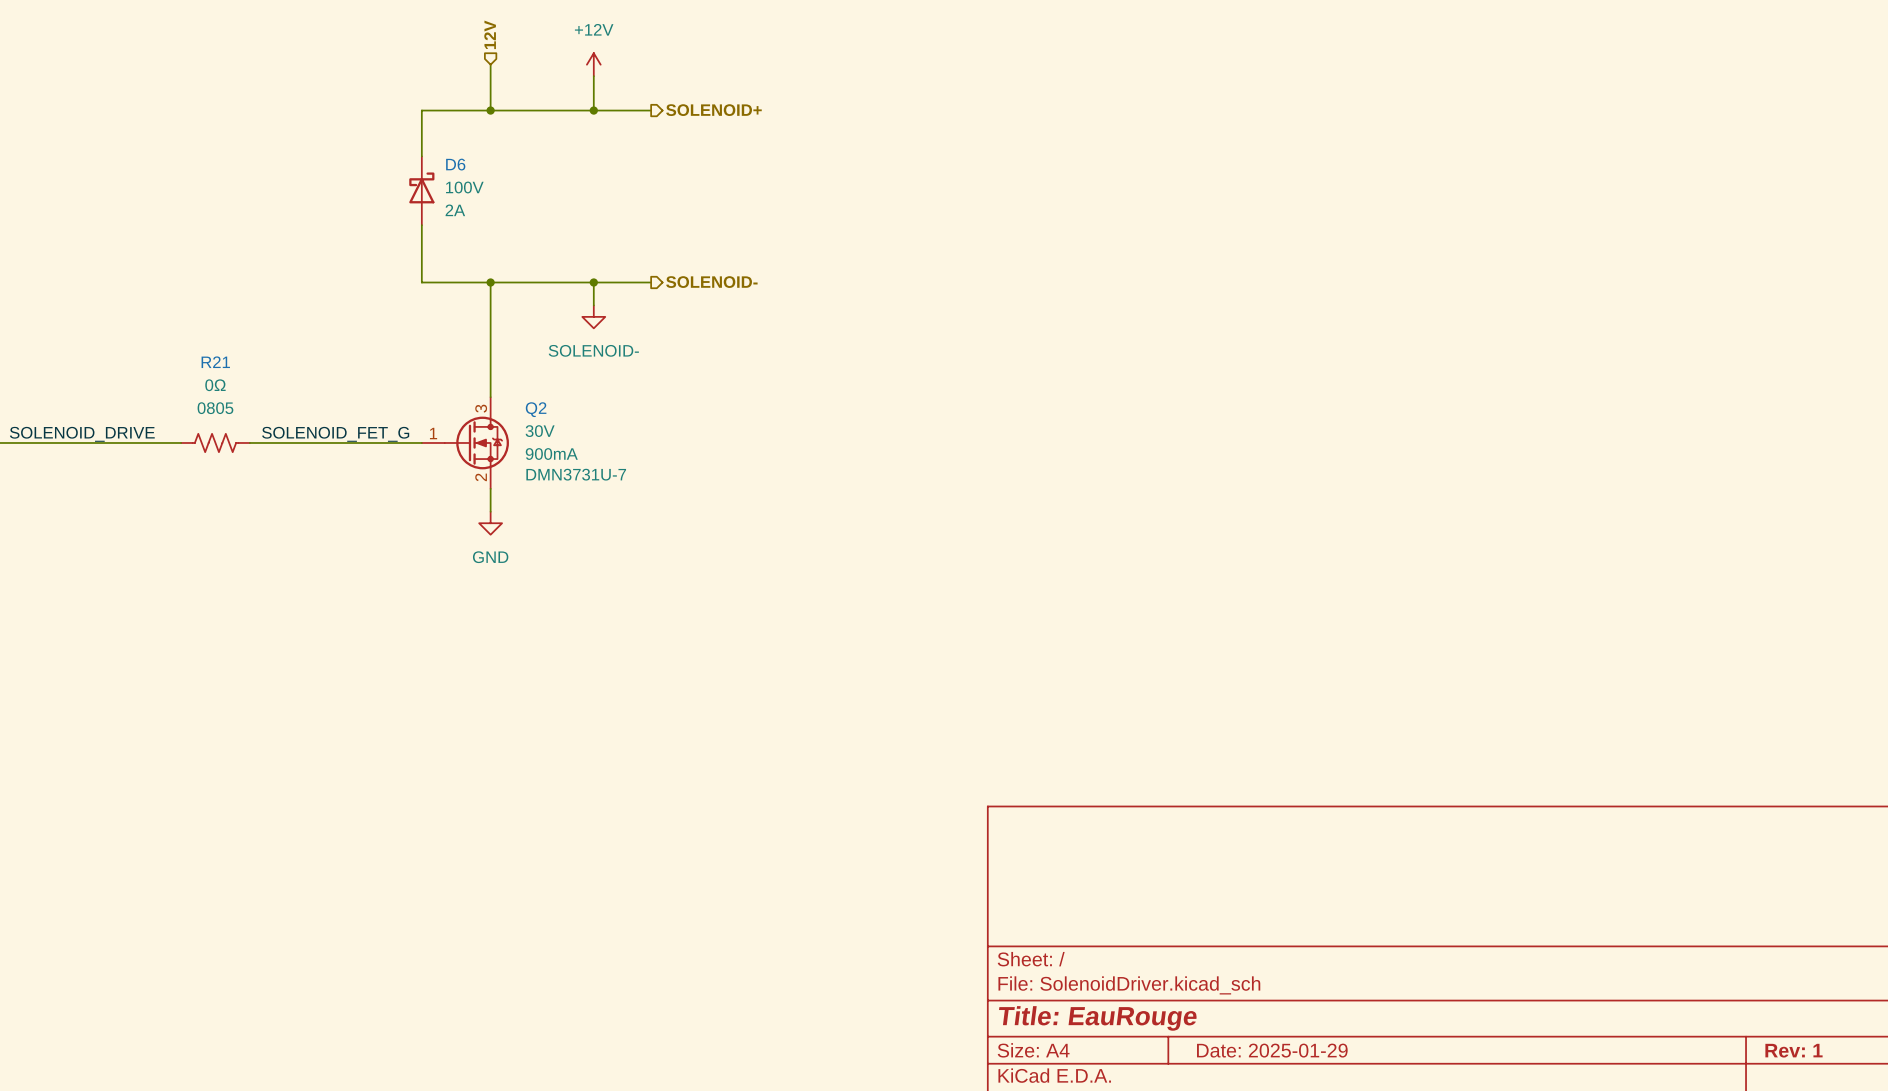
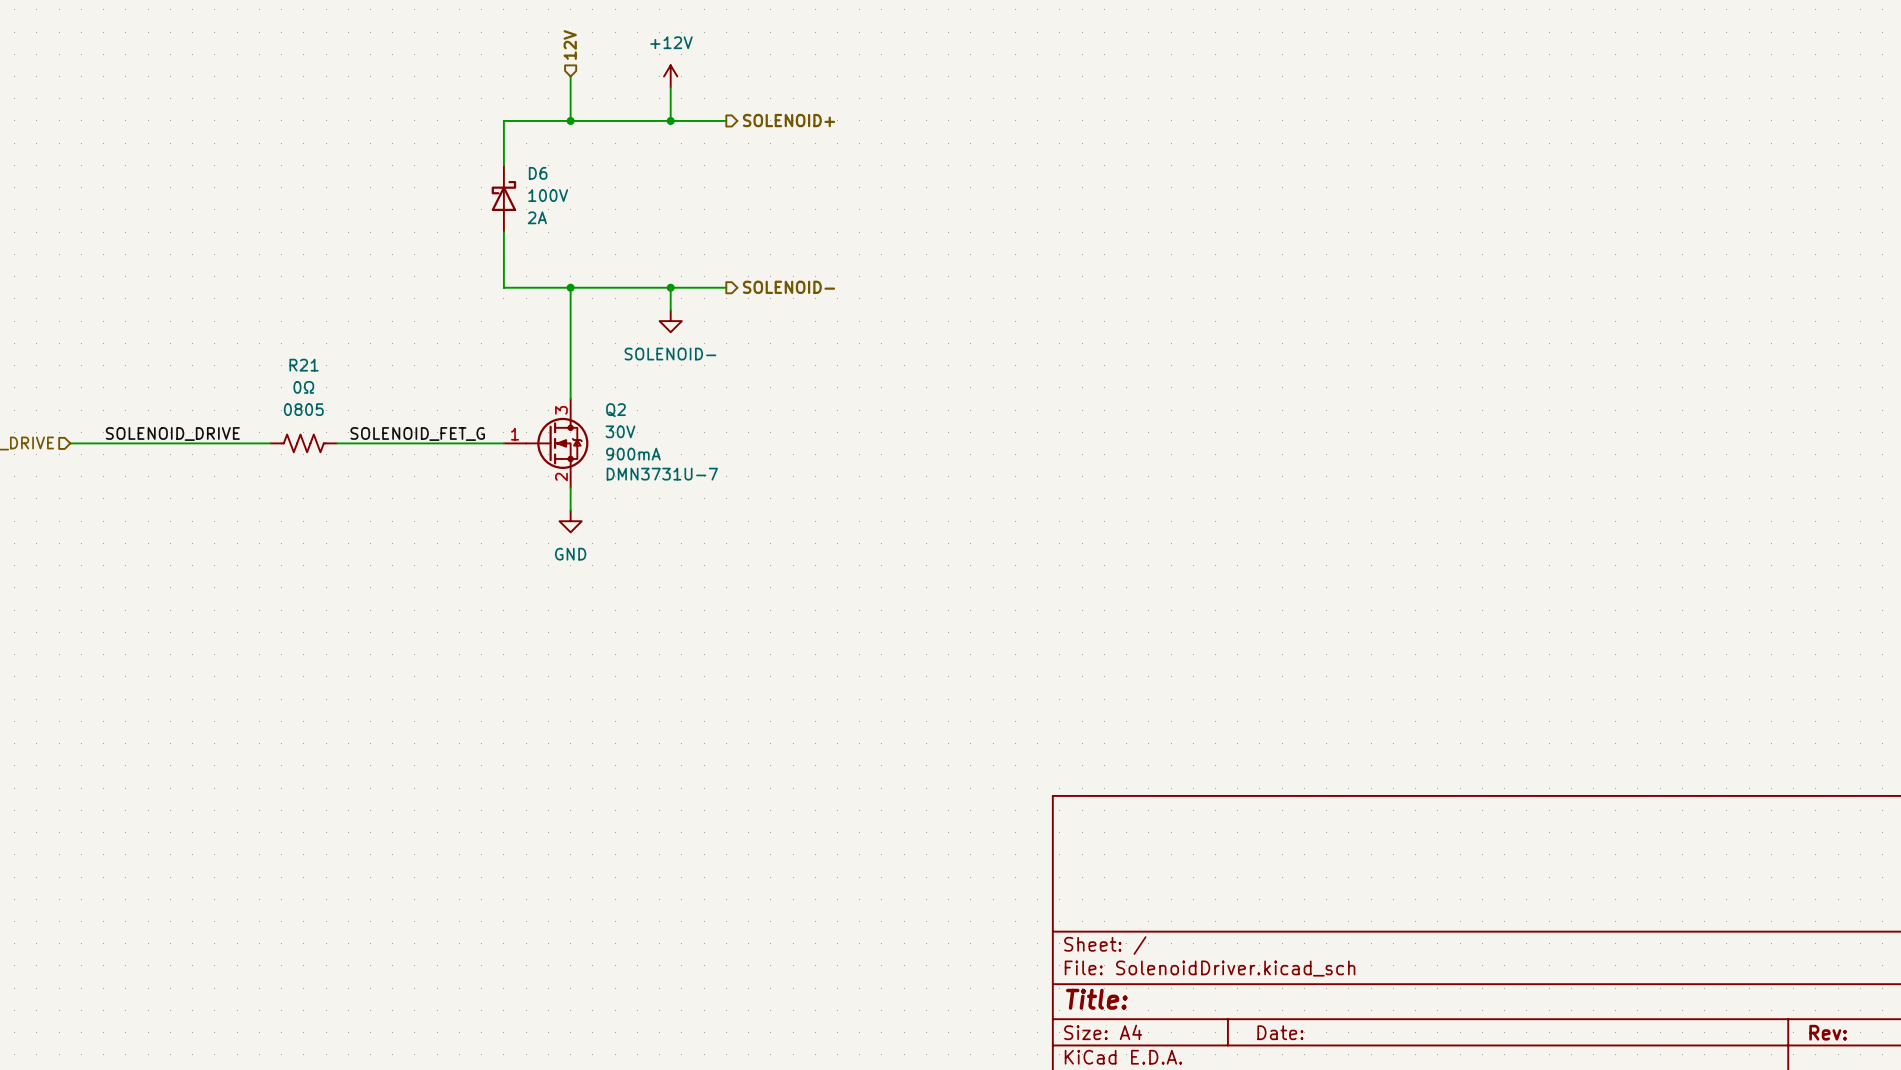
title block: Title: EauRouge (1097, 1018) -> Title: (1096, 999)
title block: Date: 2025-01-29 (1272, 1050) -> Date: (1280, 1032)
title block: Rev: 1 (1793, 1050) -> Rev: (1828, 1032)

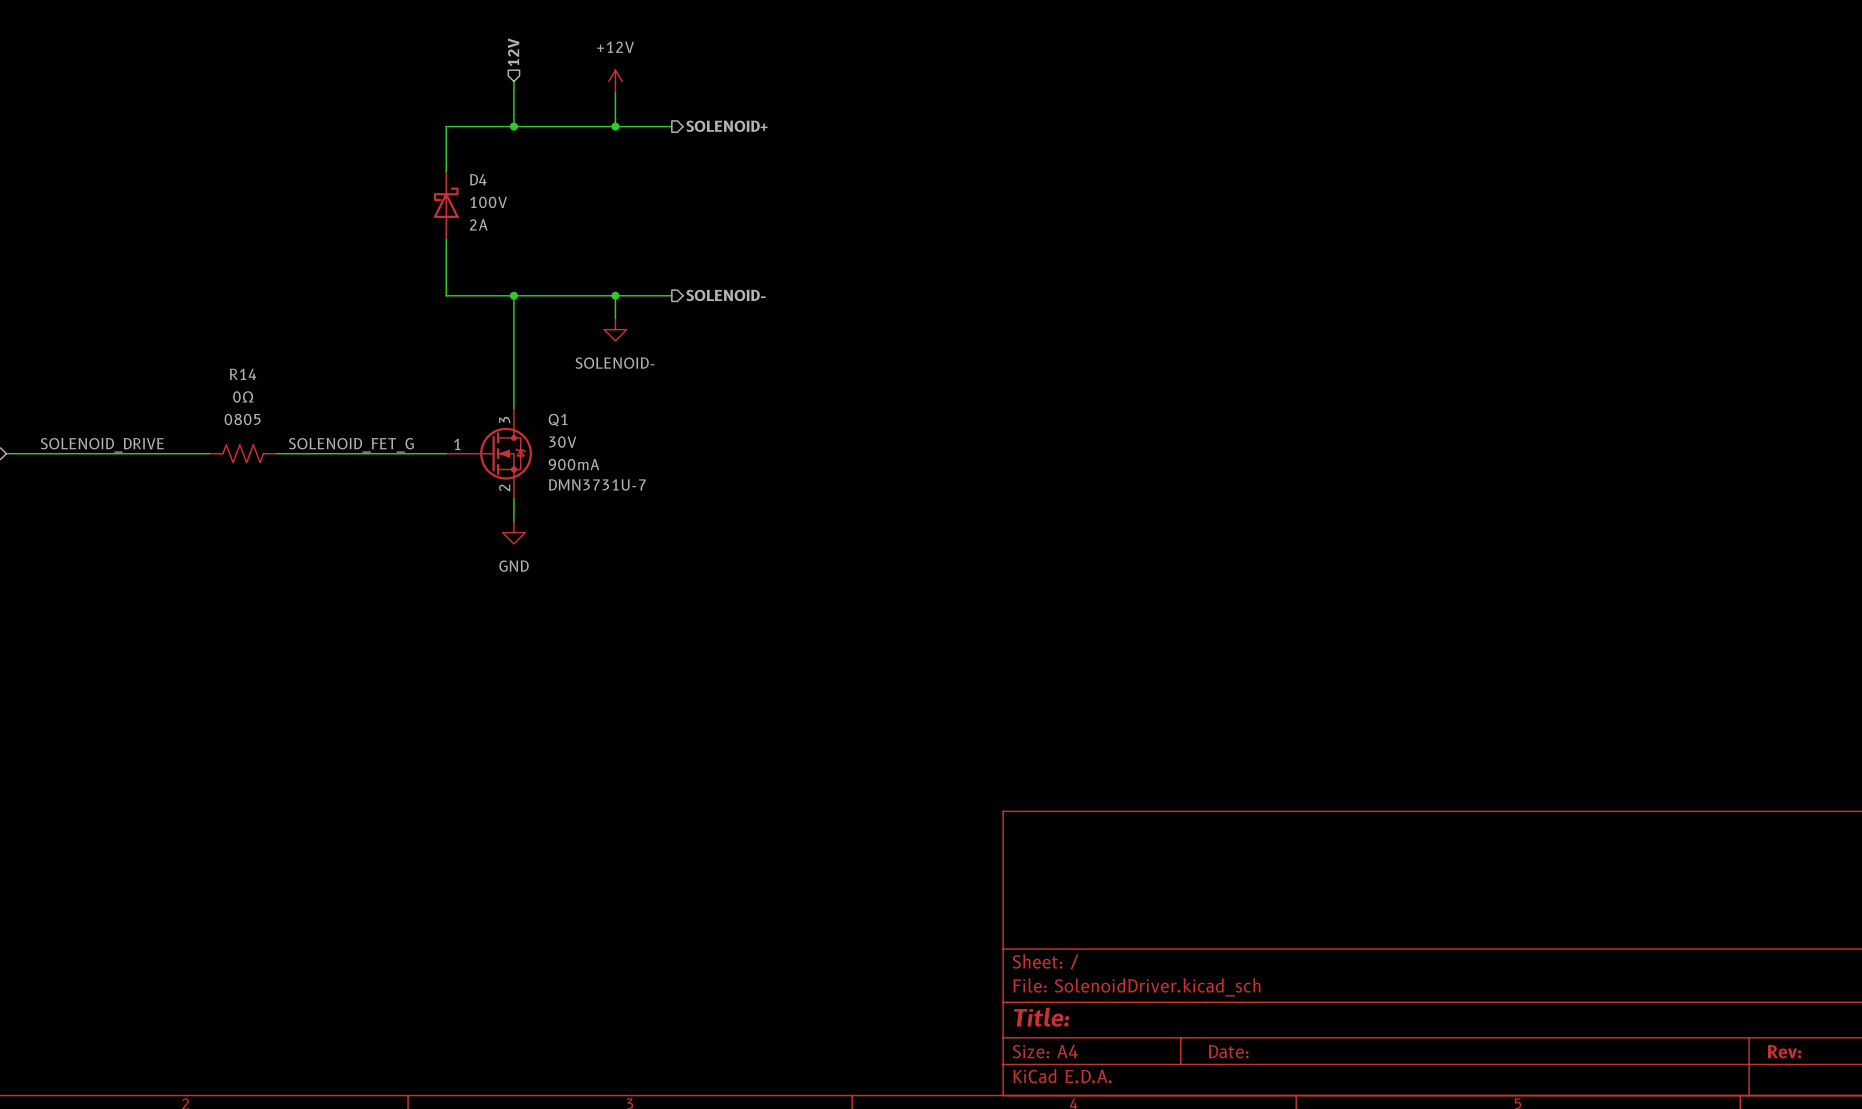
D6 name: D6 (538, 173) -> D4 (478, 179)
R21 name: R21 (304, 365) -> R14 (243, 374)
Q2 name: Q2 (615, 410) -> Q1 (558, 419)

